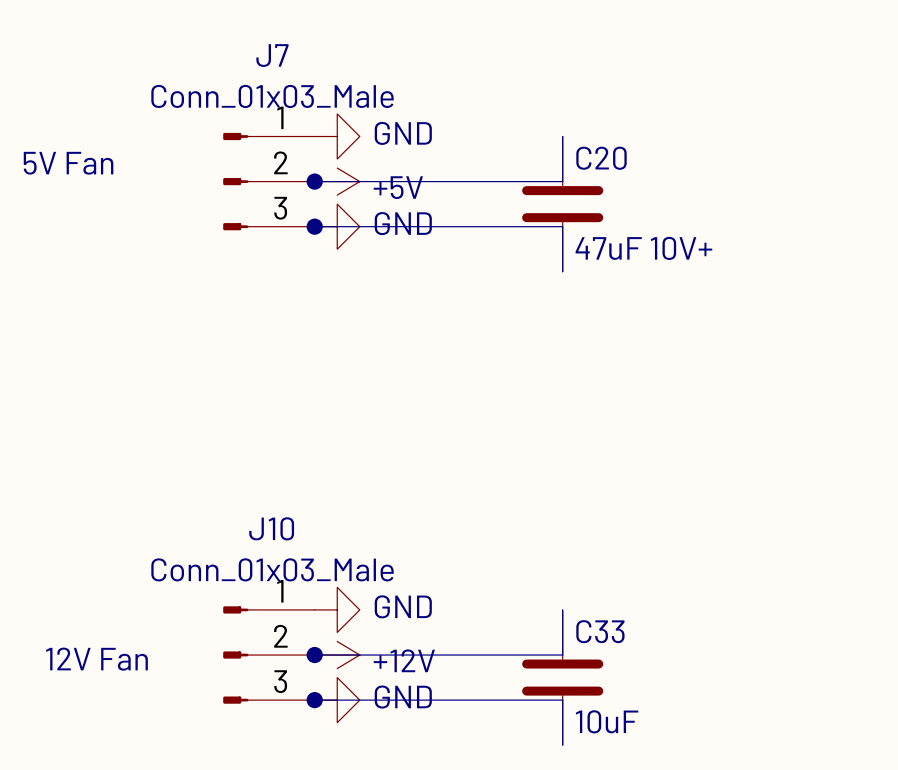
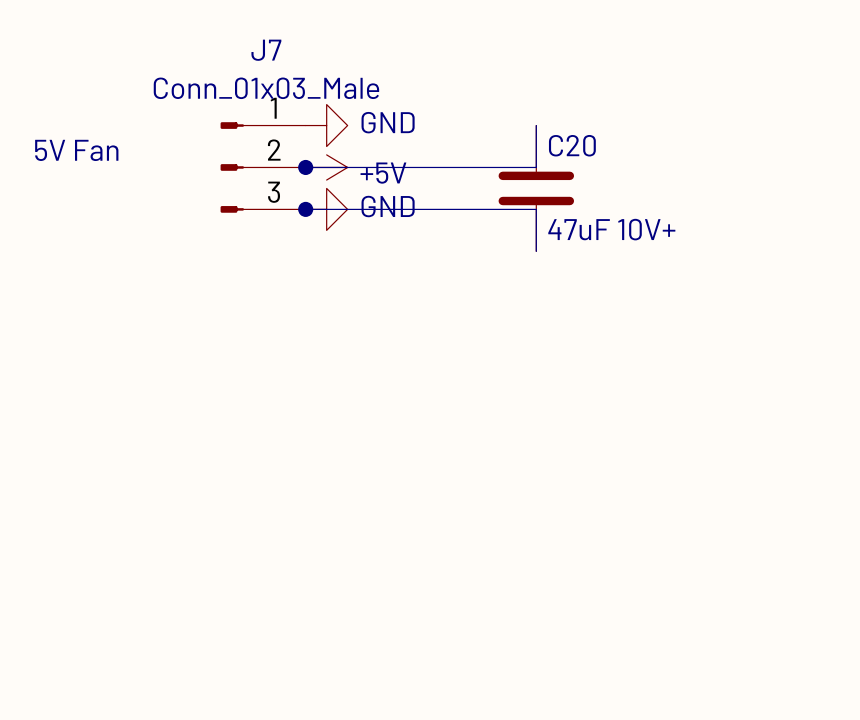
power symbol: GND (337, 609) -> none
wire: (562, 609) (562, 655) (314, 655) -> none
J10: Conn_01x03_Male (268, 655) -> none
junction: (314, 655) -> none
power symbol: +12V (337, 655) -> none
text: 12V Fan (96, 659) -> none
C33: 10uF (562, 677) -> none
wire: (314, 700) (562, 700) (562, 745) -> none
junction: (314, 700) -> none
power symbol: GND (337, 700) -> none

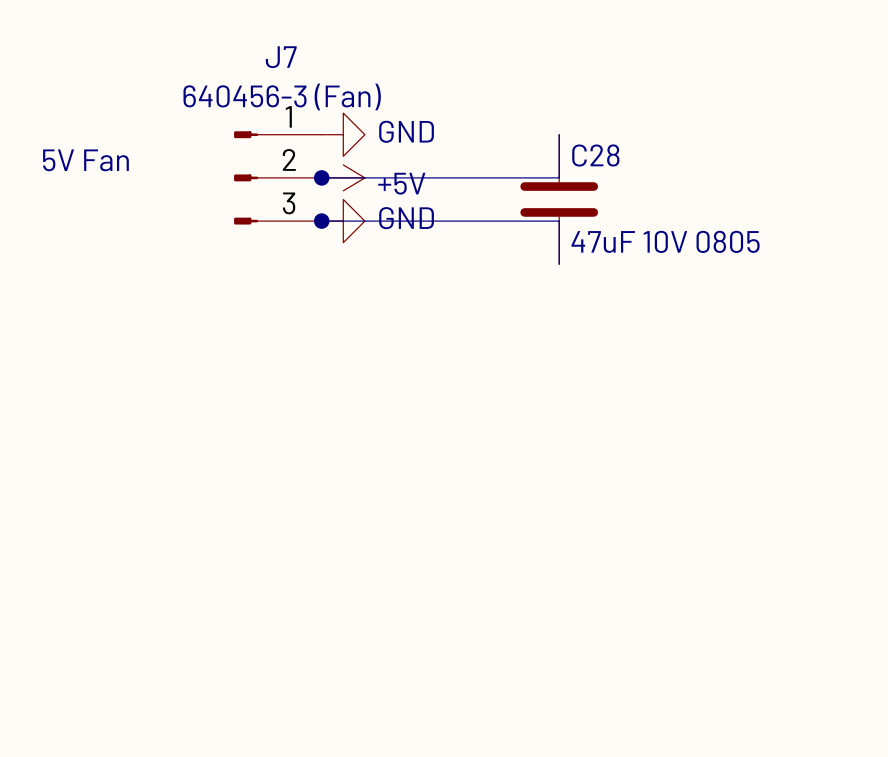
J7 value: Conn_01x03_Male (266, 88) -> 640456-3 (Fan) (282, 96)
C20 name: C20 (572, 145) -> C28 (595, 155)
C20 value: 47uF 10V+ (611, 229) -> 47uF 10V 0805 (665, 241)

